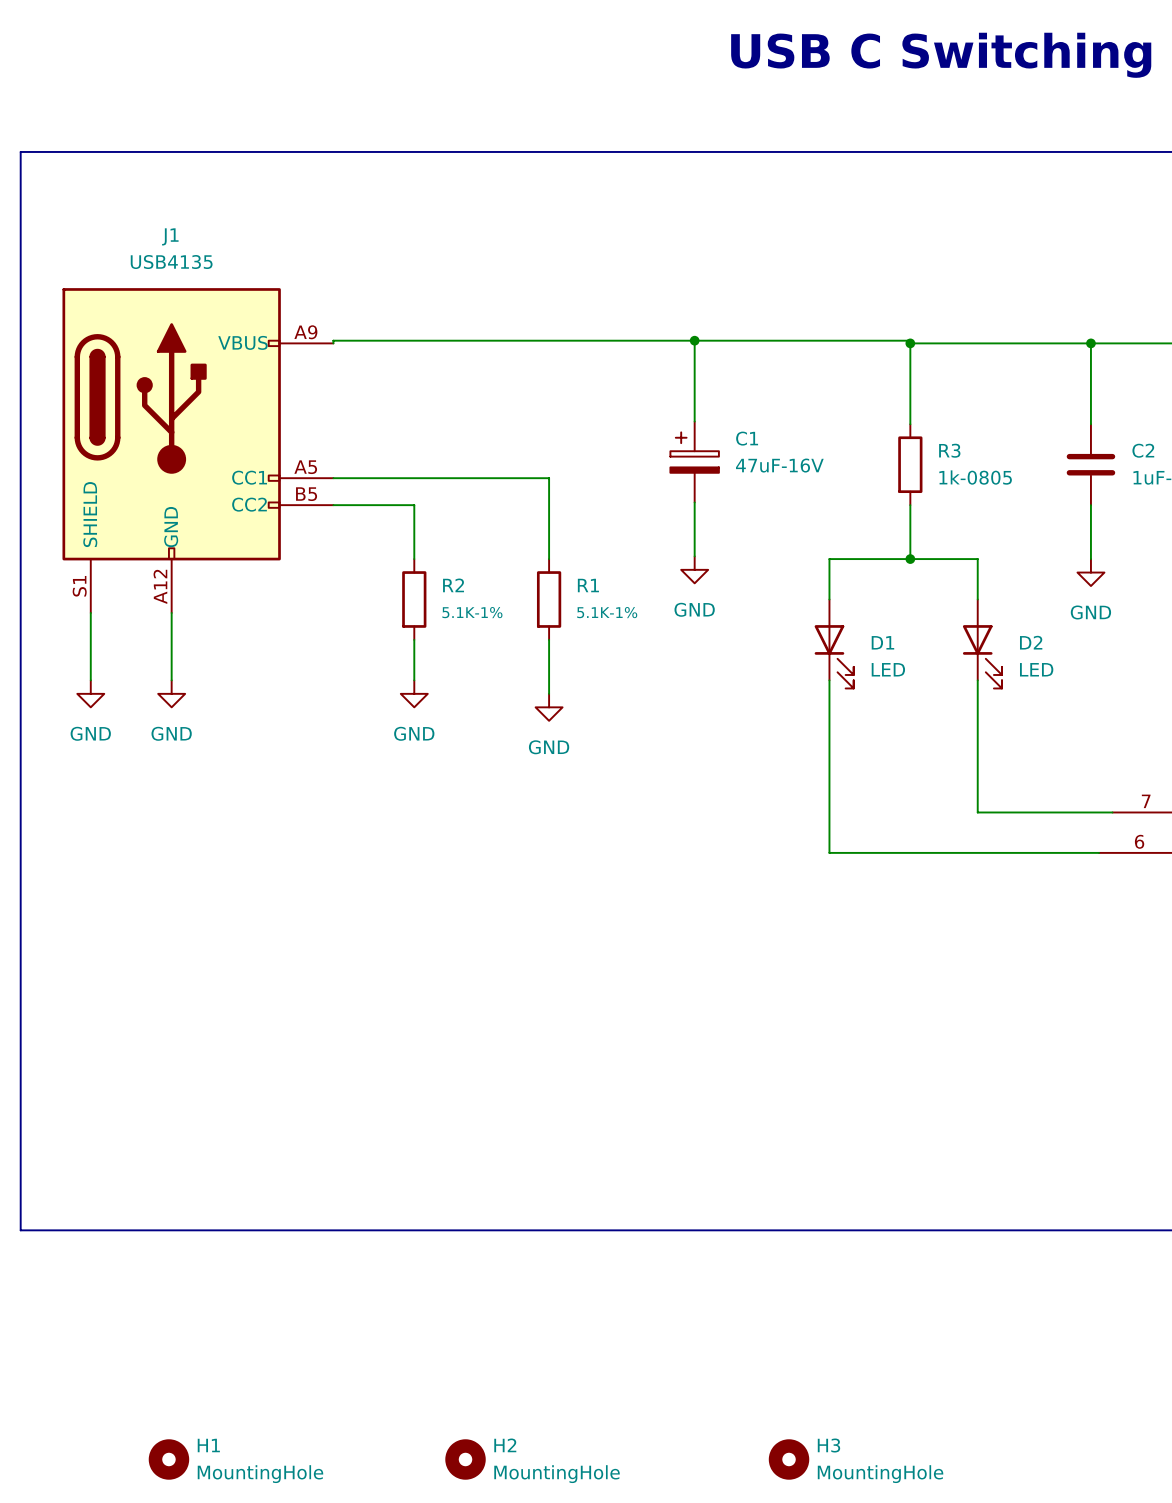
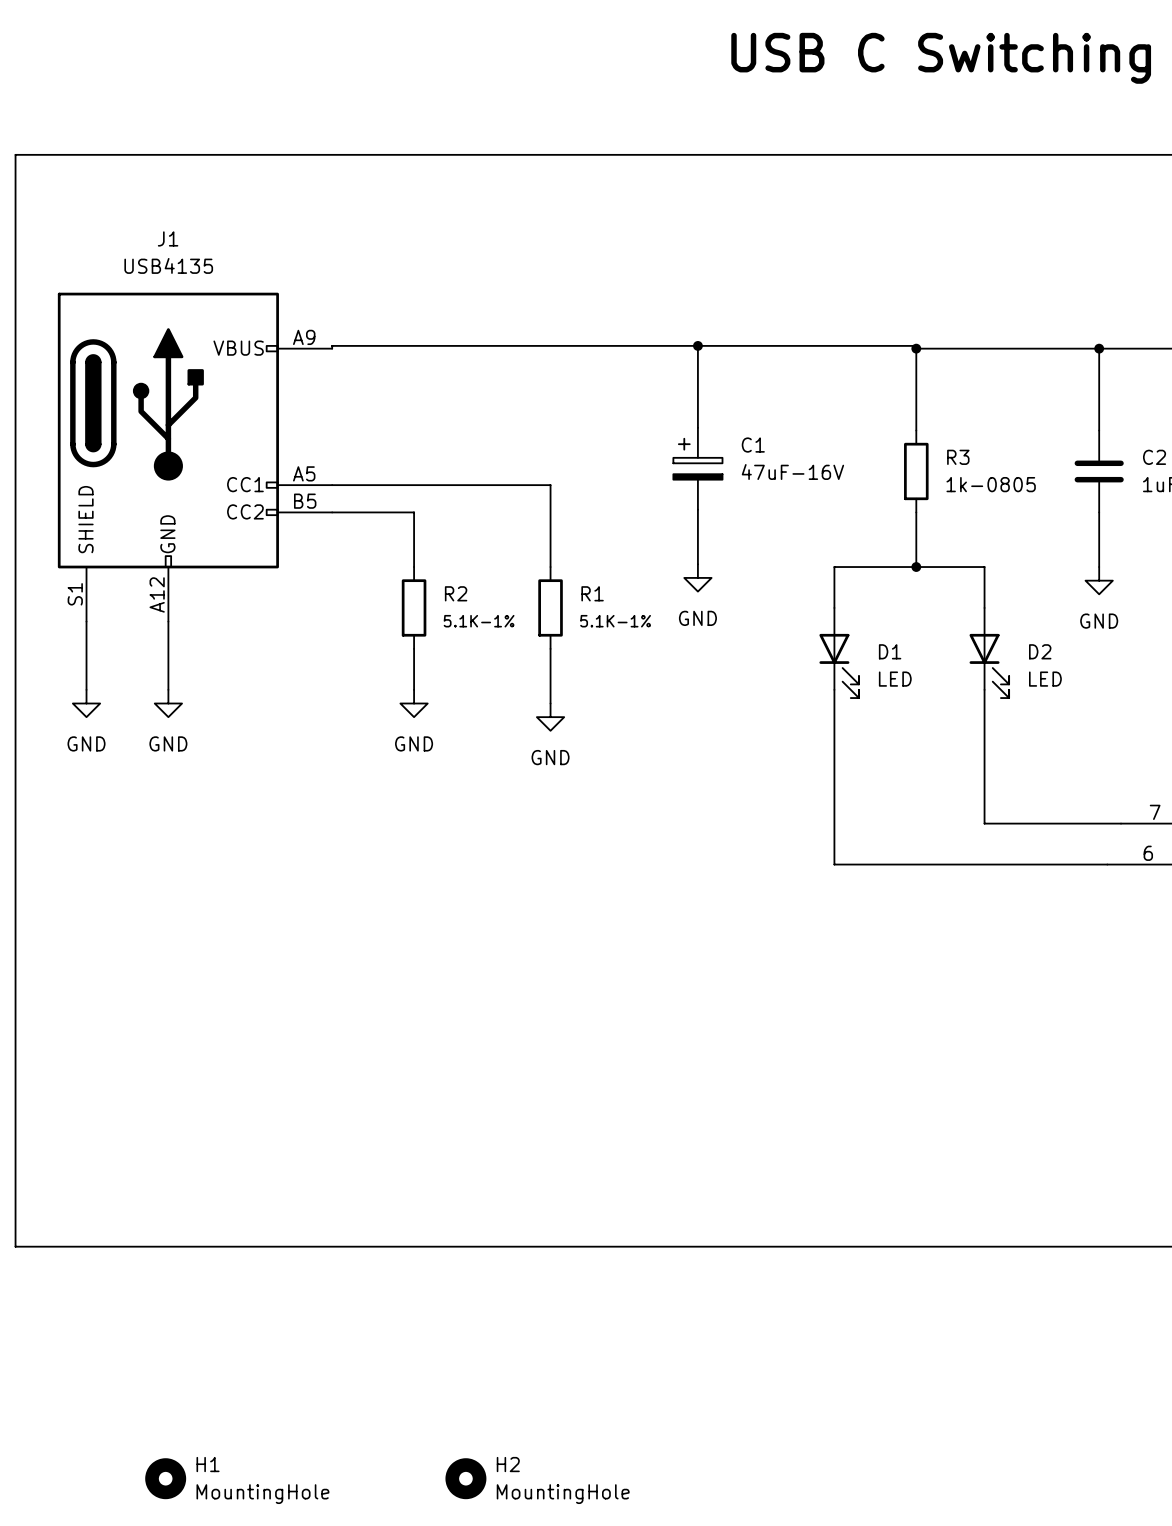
H3: MountingHole (789, 1459) -> none

